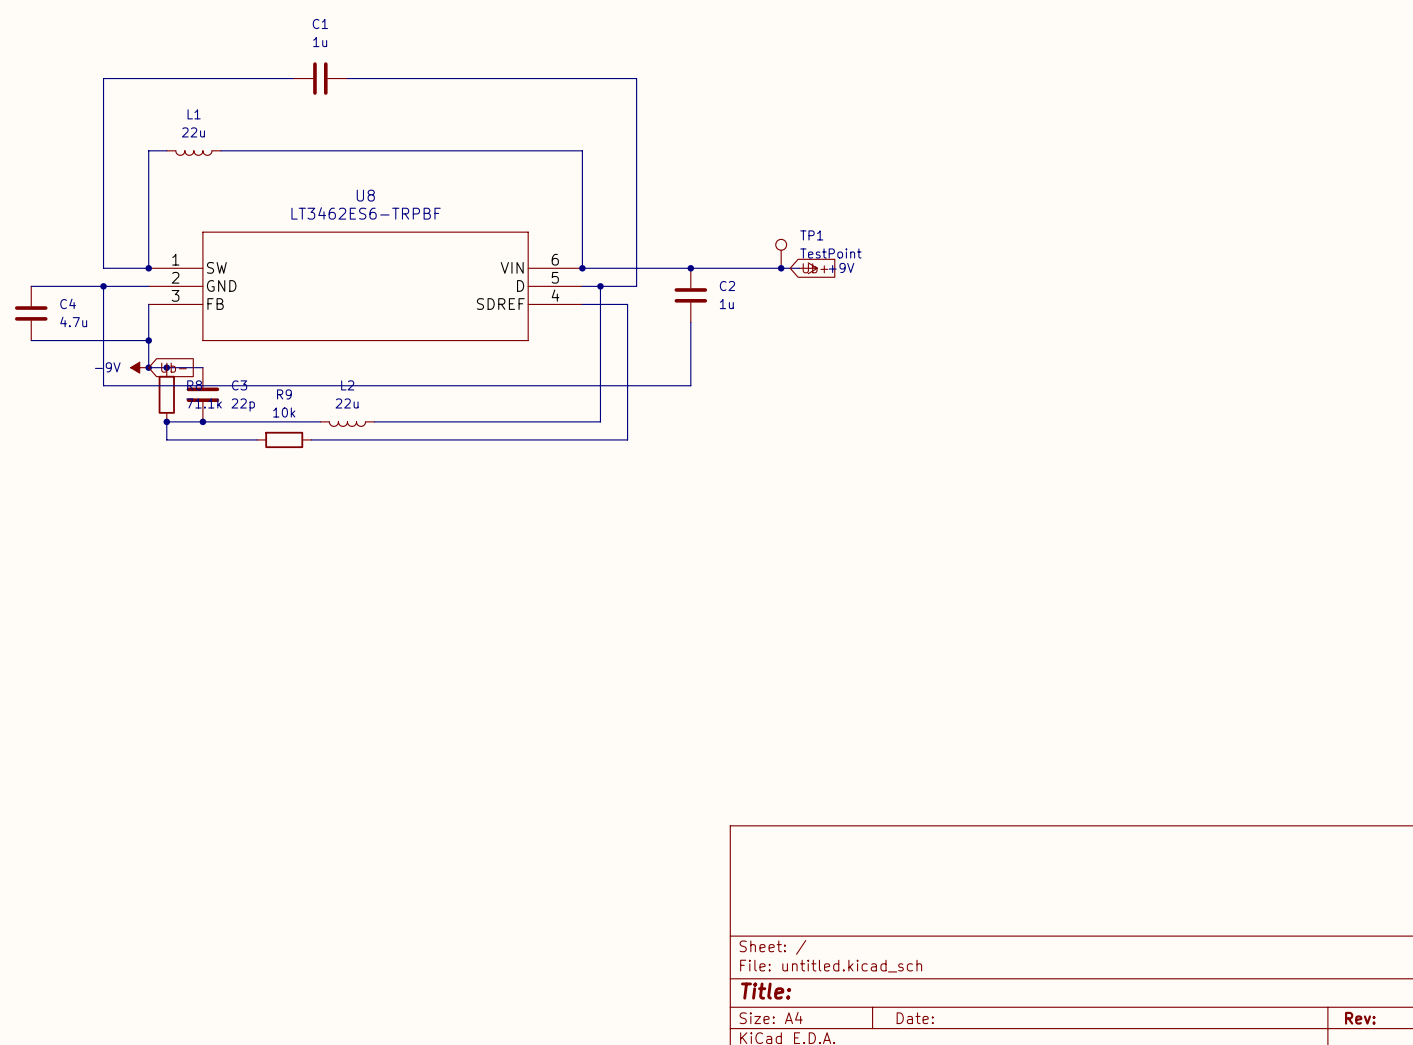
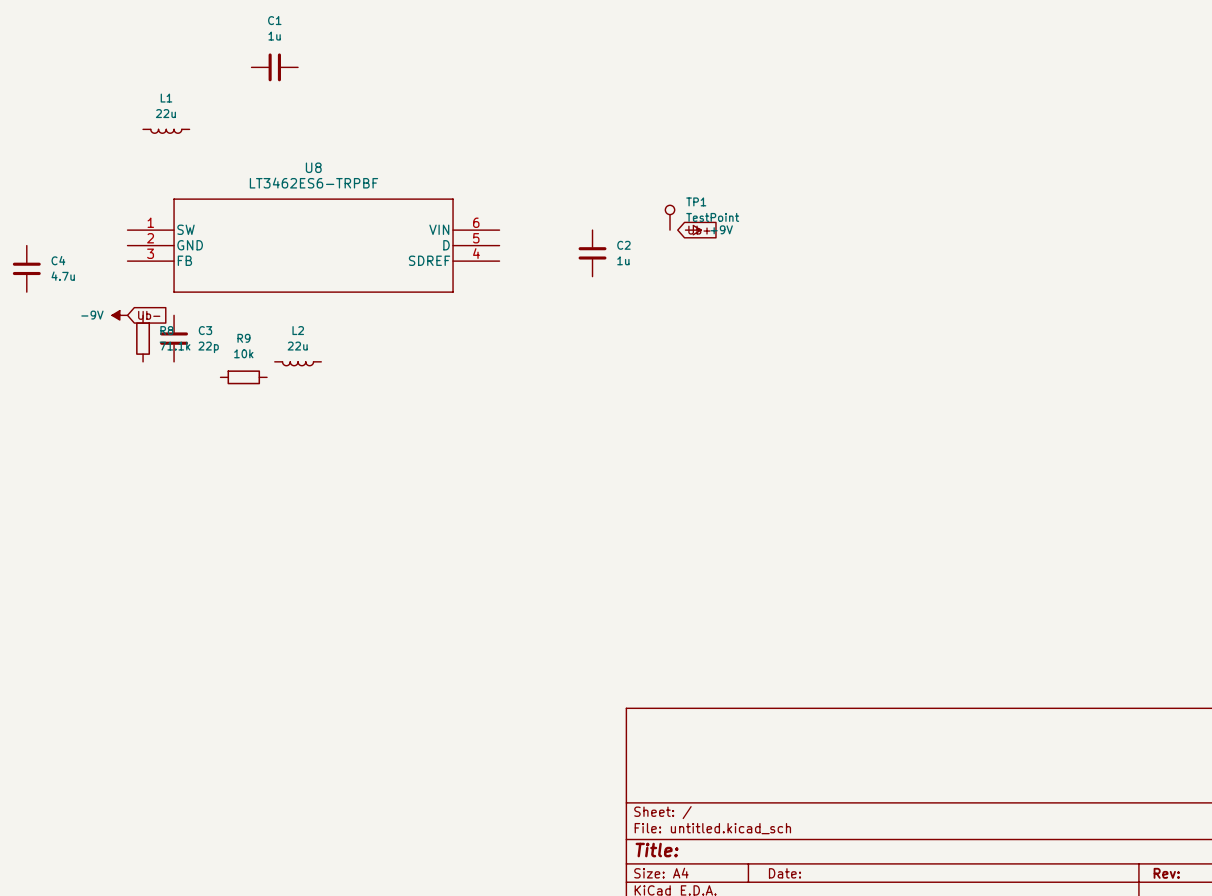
wire: (293, 78) (103, 78) (103, 268) (148, 268) (148, 150) (166, 150) -> none
wire: (347, 78) (636, 78) (636, 286) (582, 286) -> none
wire: (220, 150) (582, 150) (582, 268) (799, 268) -> none
junction: (148, 268) -> none
junction: (582, 268) -> none
junction: (690, 268) -> none
junction: (781, 268) -> none
wire: (31, 286) (148, 286) -> none
wire: (103, 286) (103, 385) (690, 385) (690, 322) -> none
junction: (103, 286) -> none
wire: (600, 286) (600, 421) (374, 421) -> none
junction: (600, 286) -> none
wire: (148, 304) (148, 367) (202, 367) -> none
wire: (582, 304) (627, 304) (627, 439) (311, 439) -> none
wire: (31, 340) (148, 340) -> none
junction: (148, 340) -> none
junction: (148, 367) -> none
junction: (166, 367) -> none
junction: (166, 421) -> none
junction: (202, 421) -> none
wire: (320, 421) (166, 421) (166, 439) (257, 439) -> none

